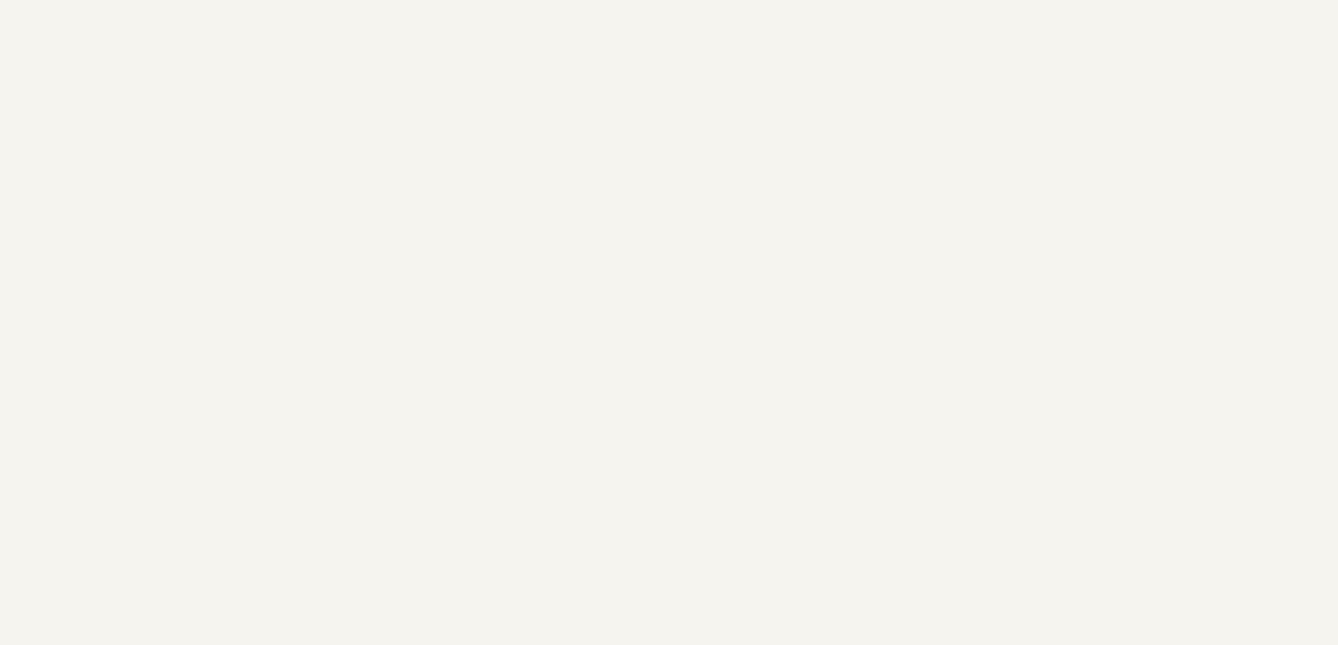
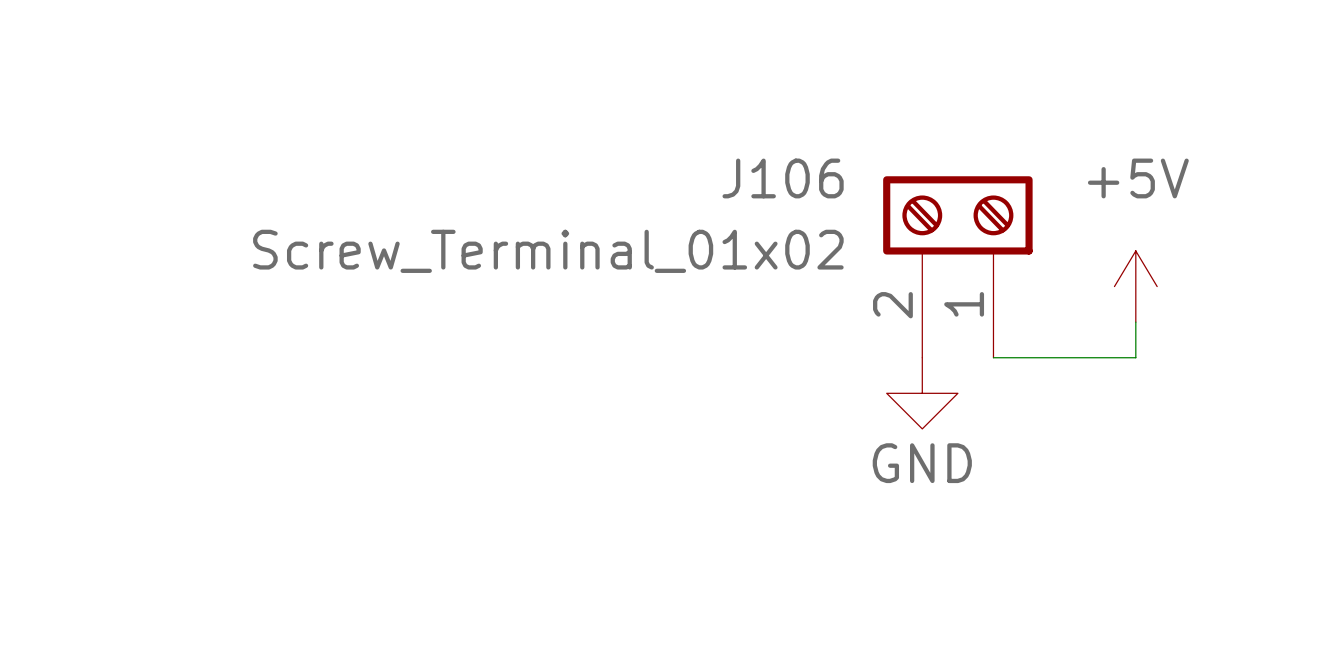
J106: none -> Screw_Terminal_01x02 (957, 266)
power symbol: none -> +5V (1135, 286)
wire: none -> (1135, 322) (1135, 357) (993, 357)
power symbol: none -> GND (922, 393)

